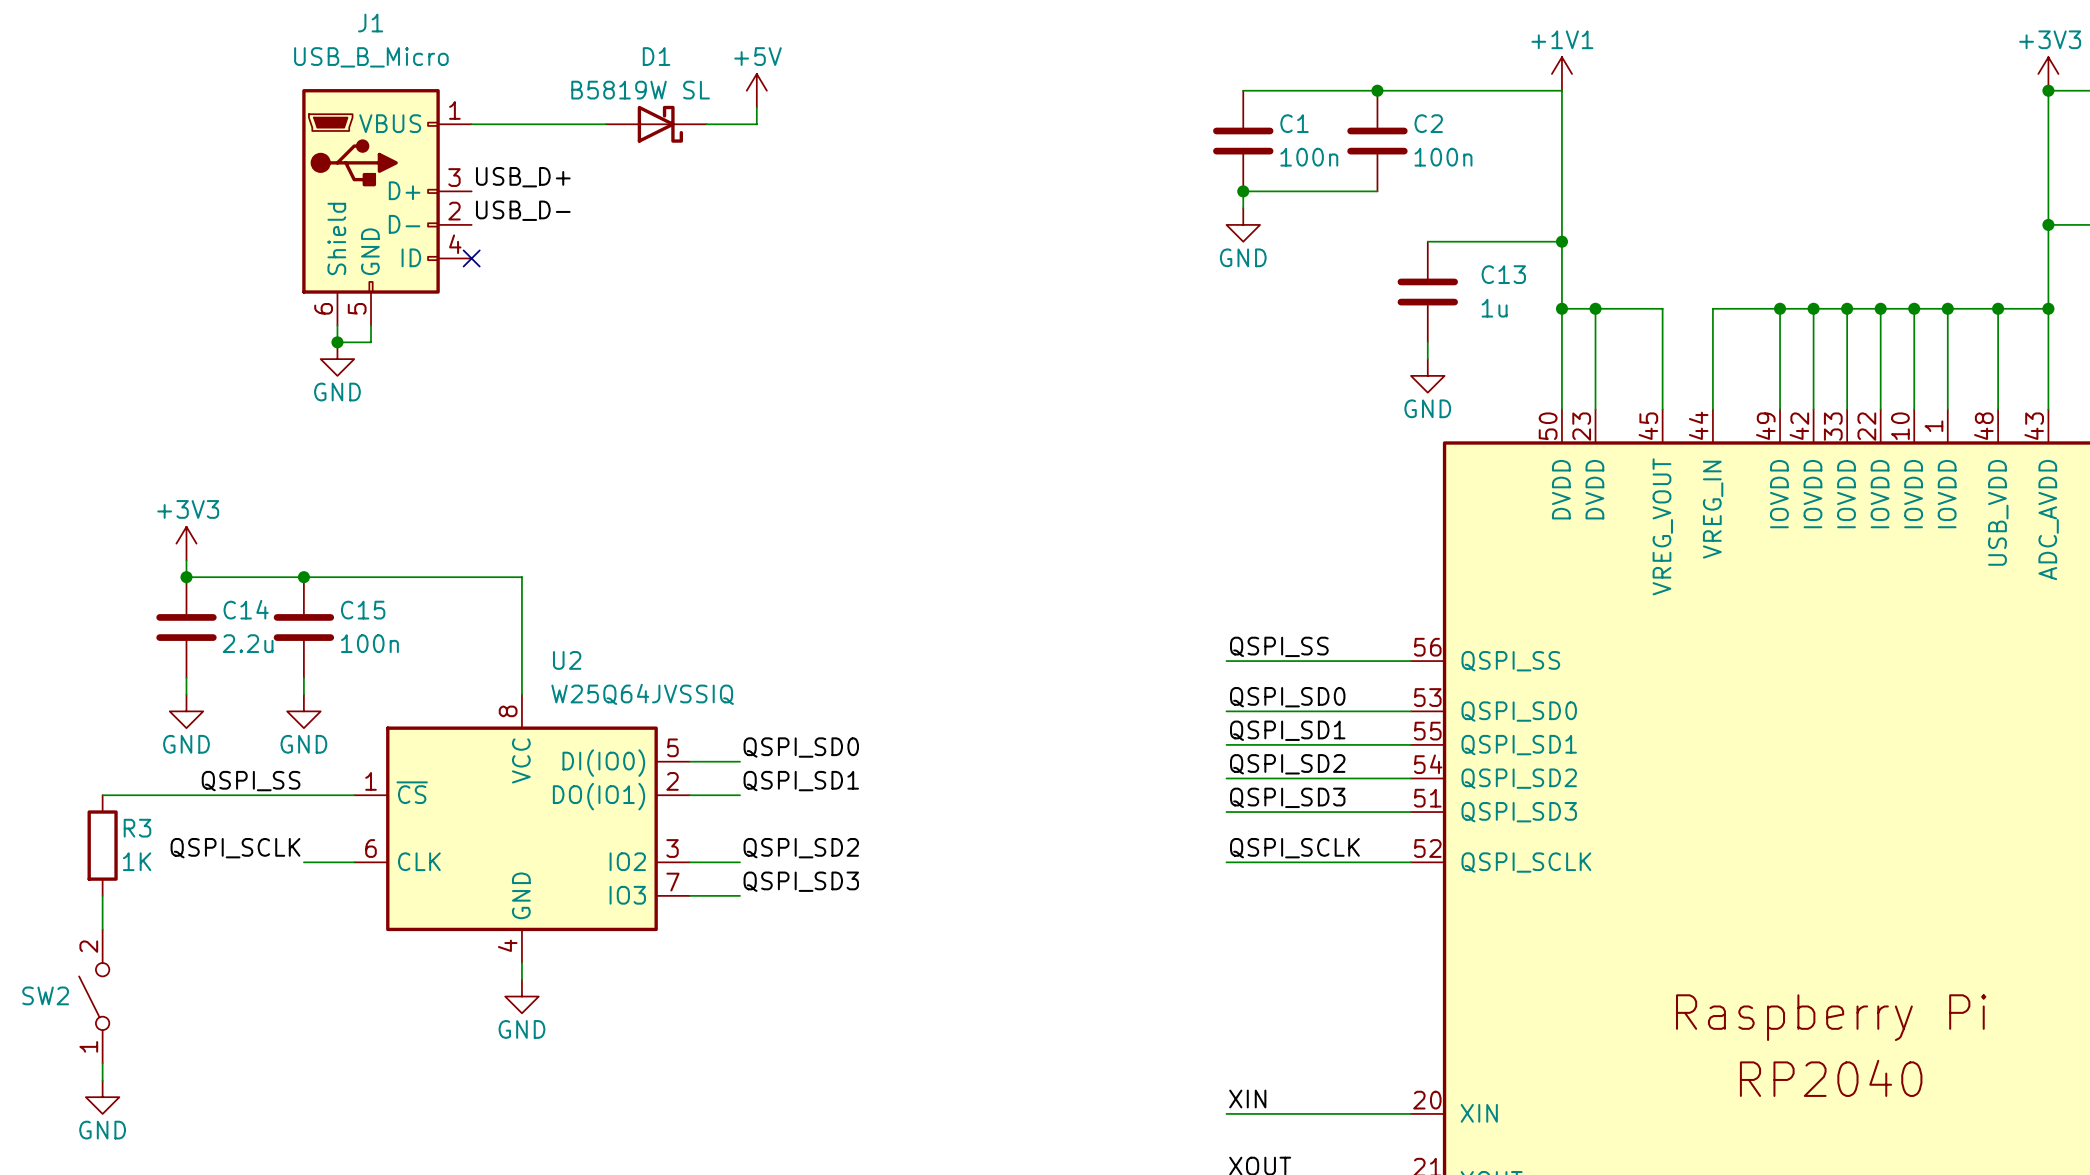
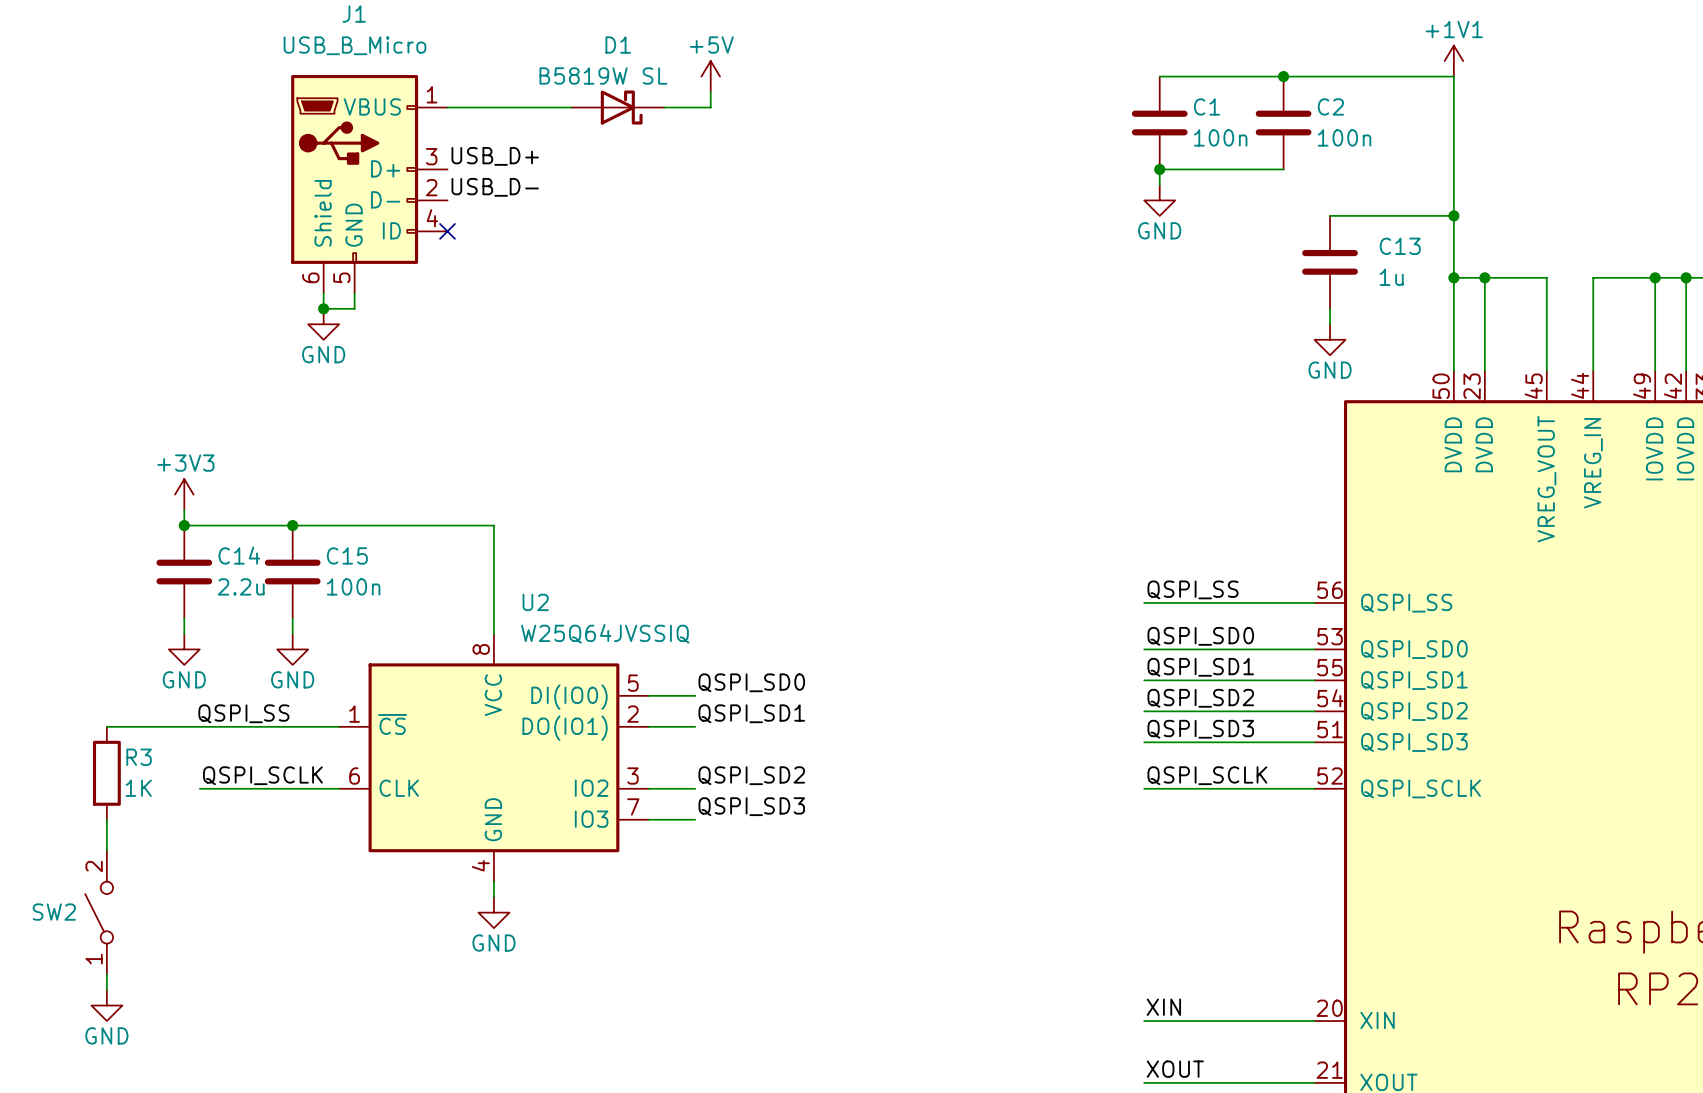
label position: QSPI_SCLK (235, 848) -> QSPI_SCLK (262, 775)
wire: none -> (199, 788) (292, 788)

